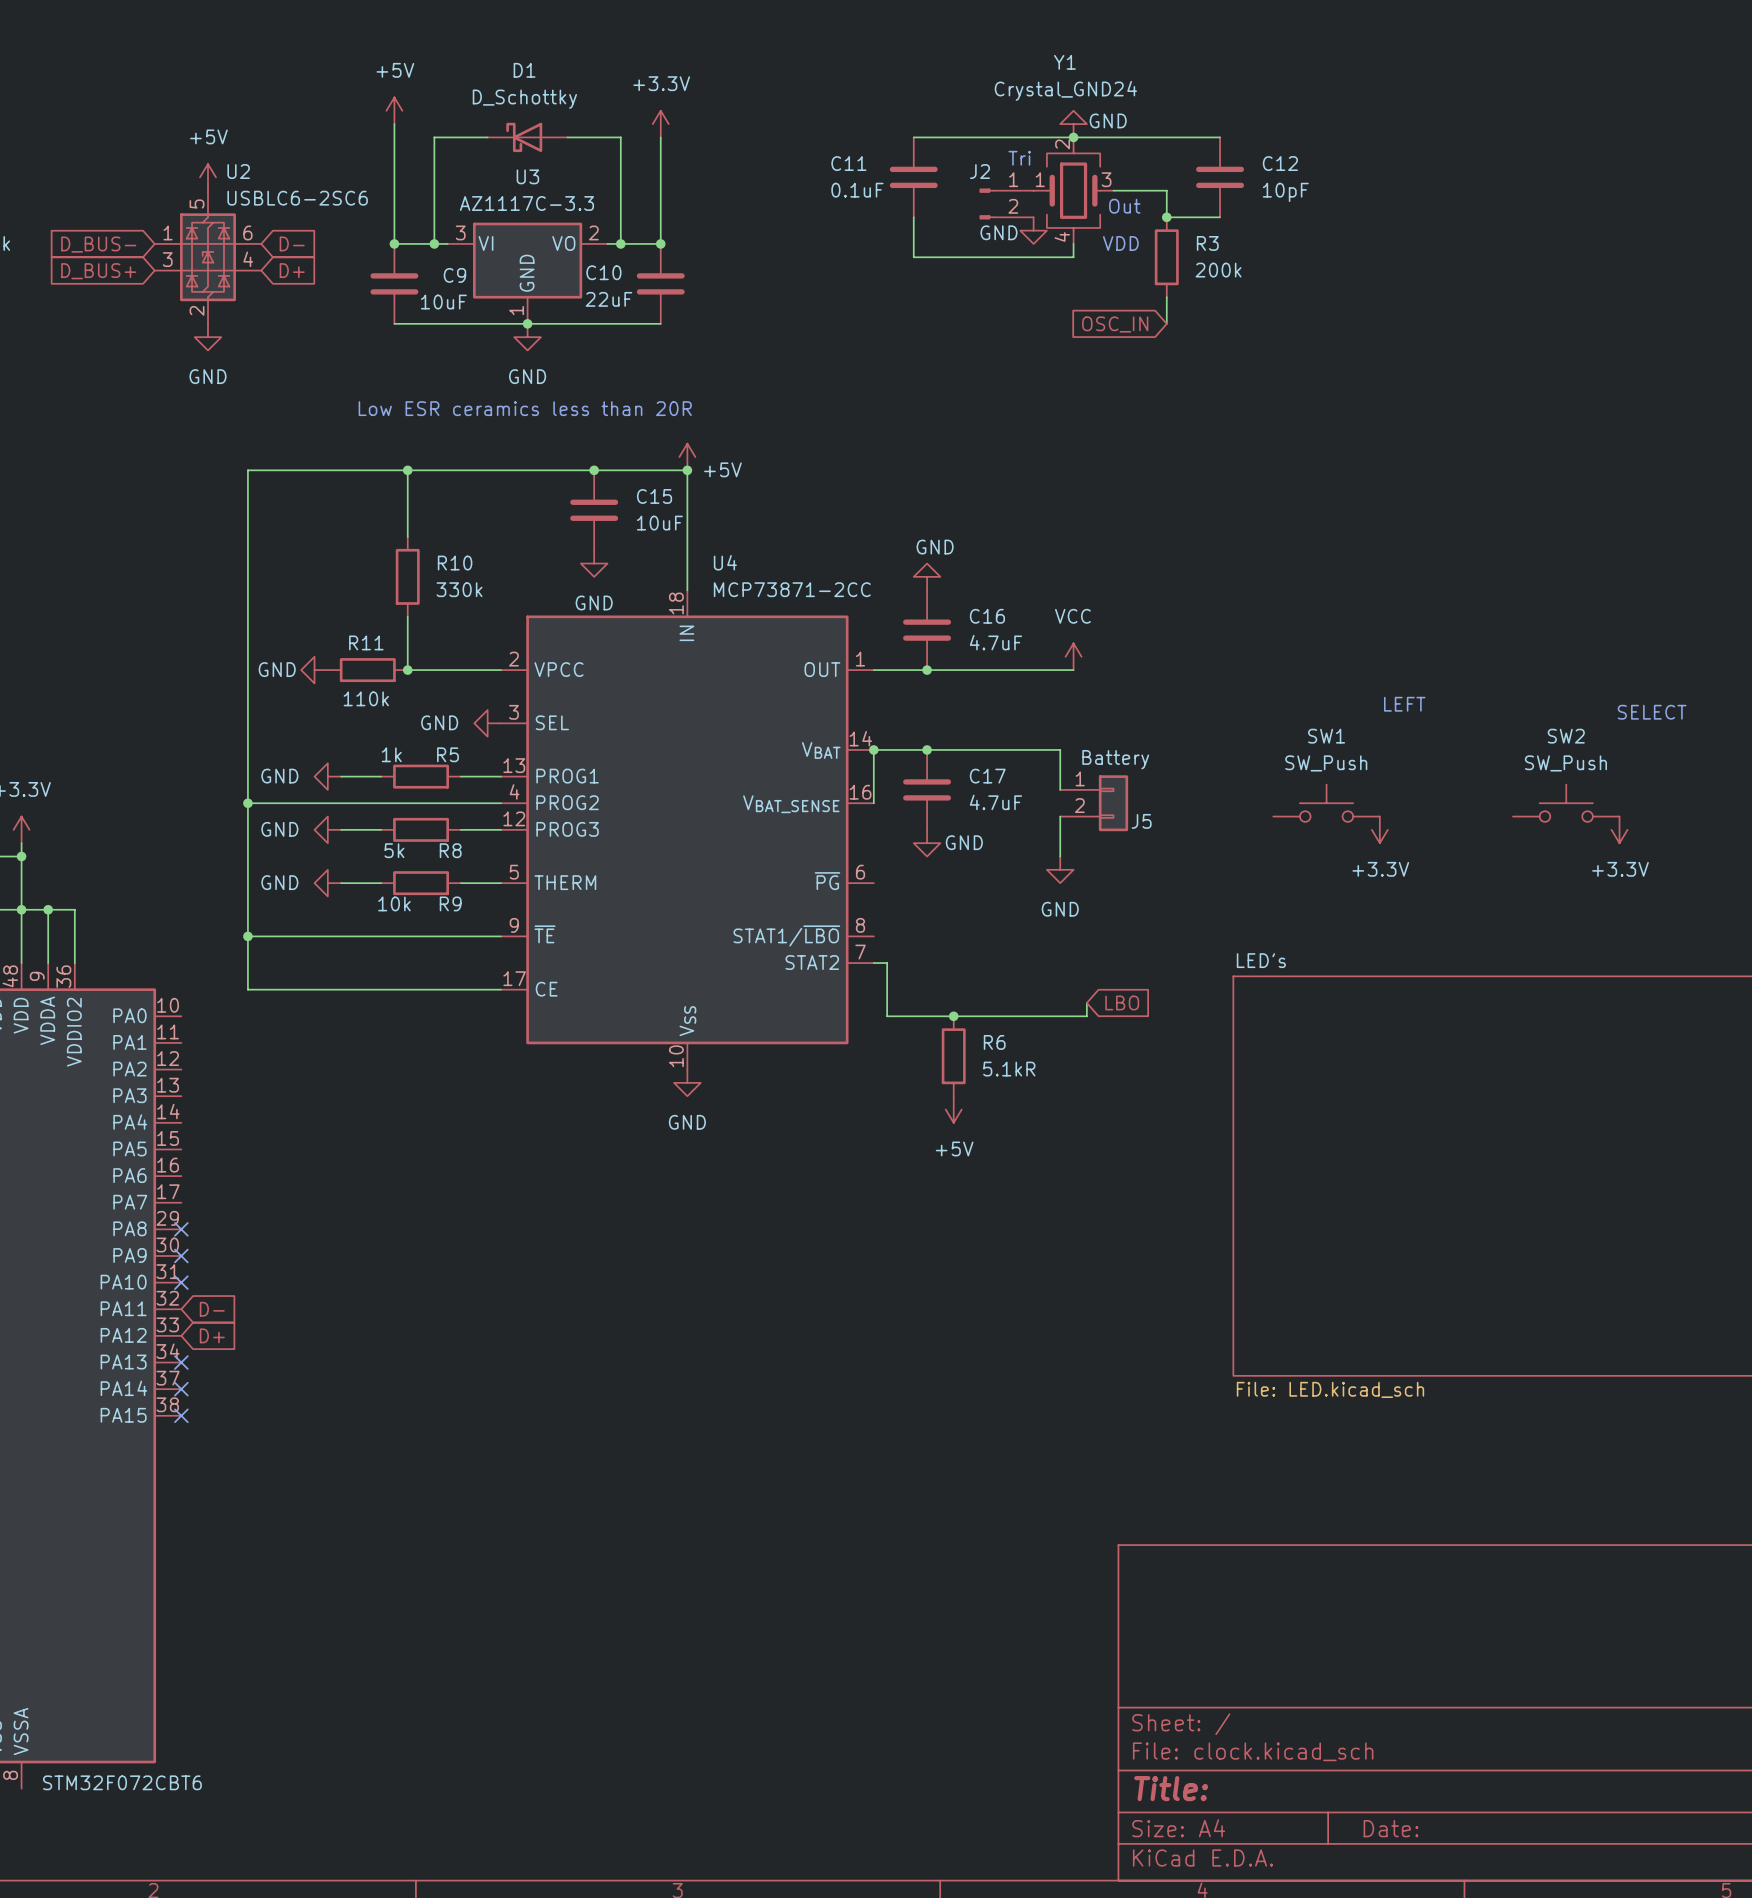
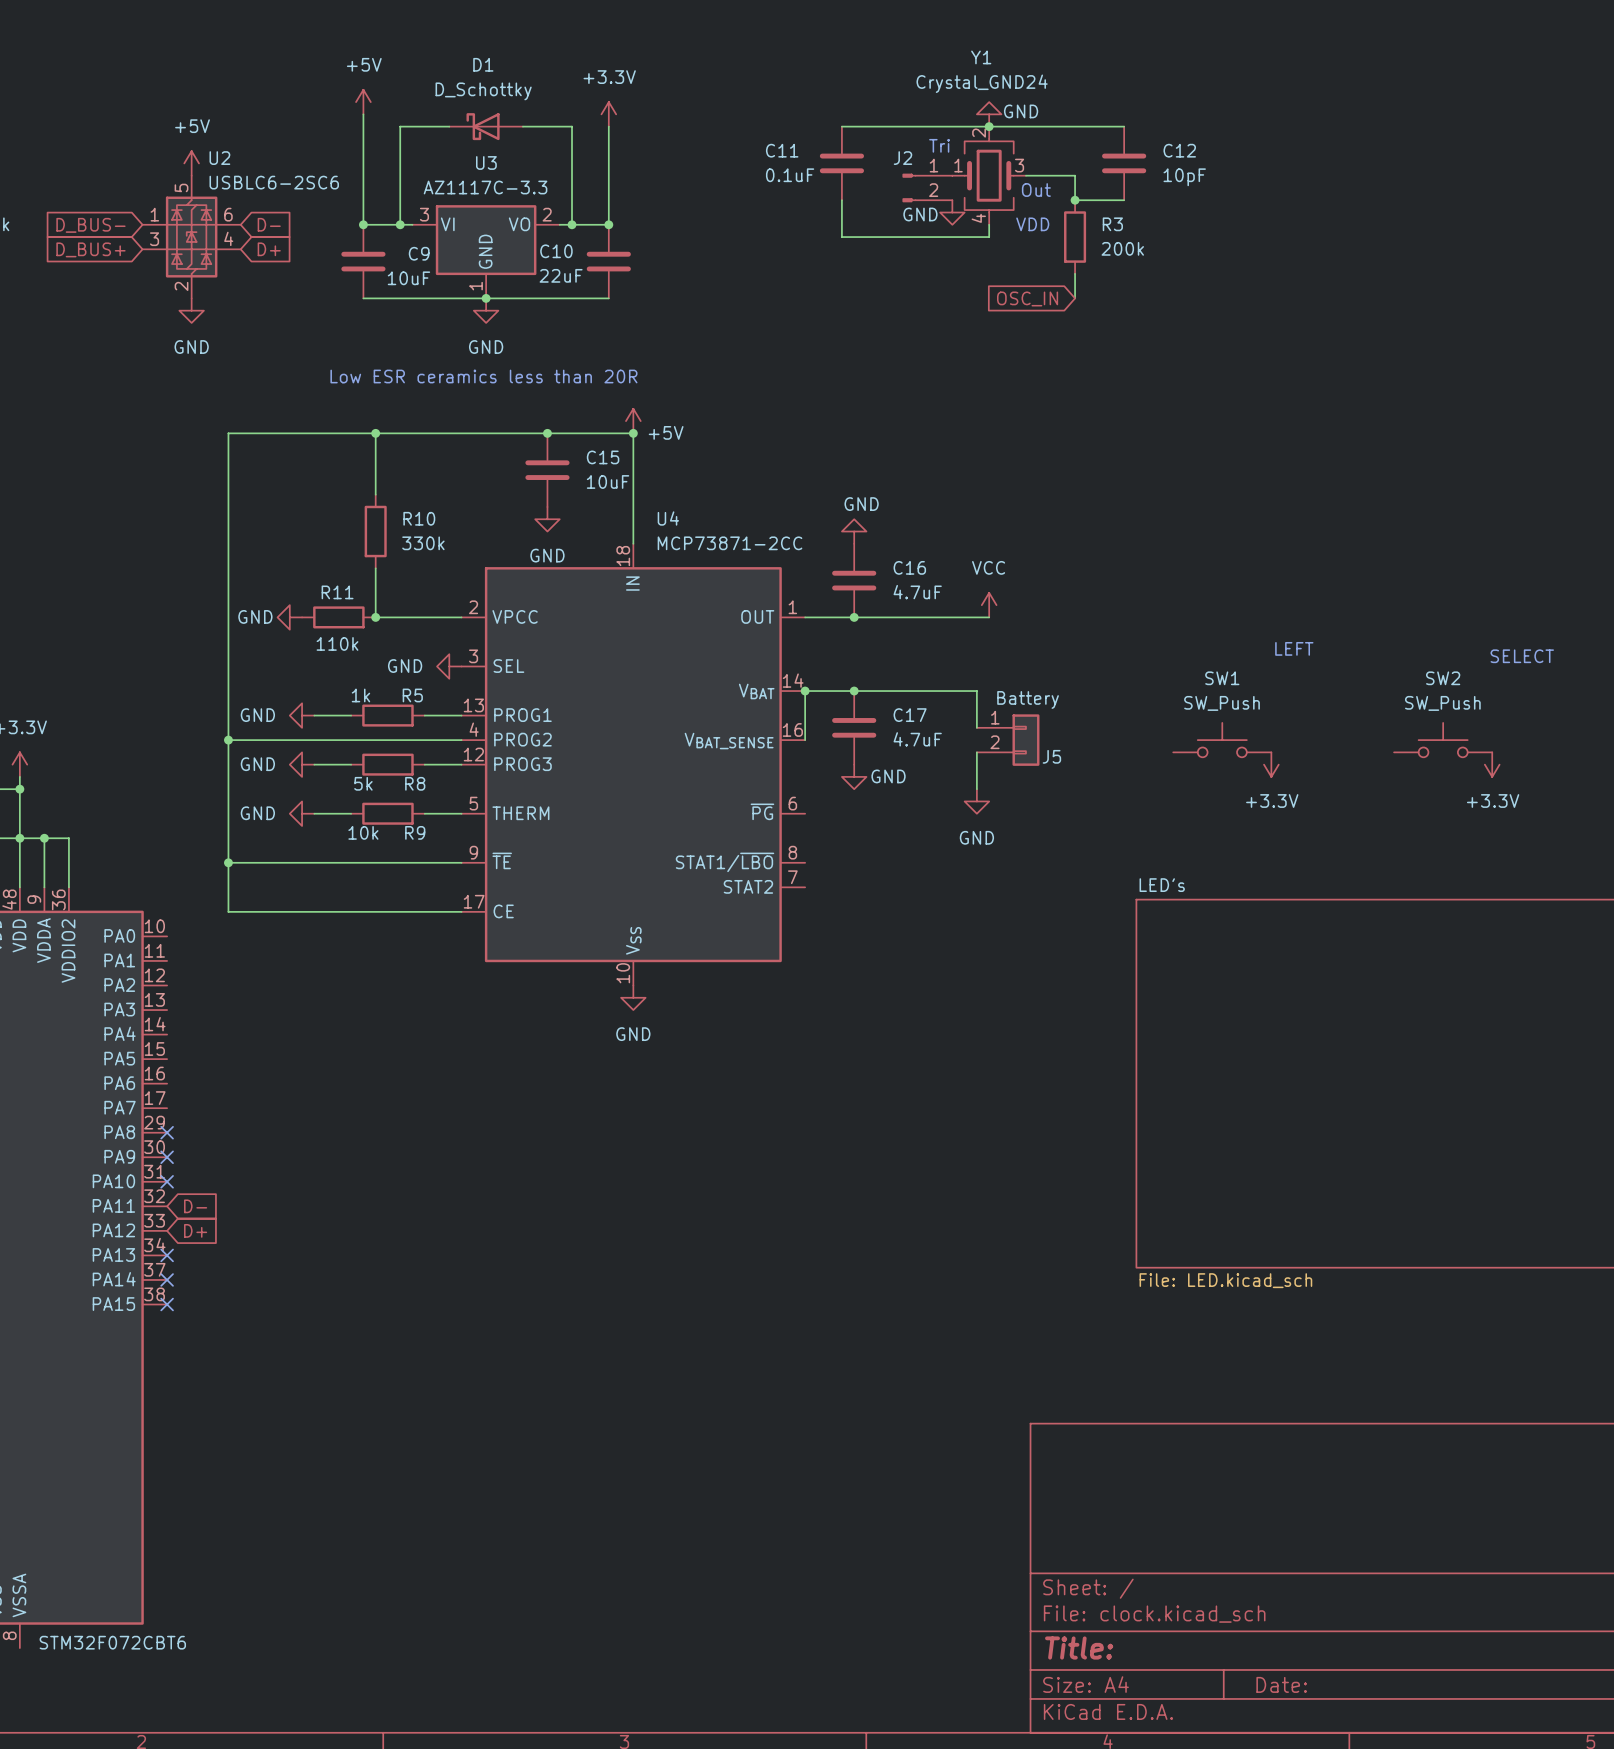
wire: (873, 963) (887, 963) (887, 1016) (1086, 1016) (1086, 1002) -> none
global label: LBO (1122, 1002) -> none
junction: (953, 1016) -> none
R6: 5.1kR (953, 1056) -> none
power symbol: +5V (953, 1109) -> none

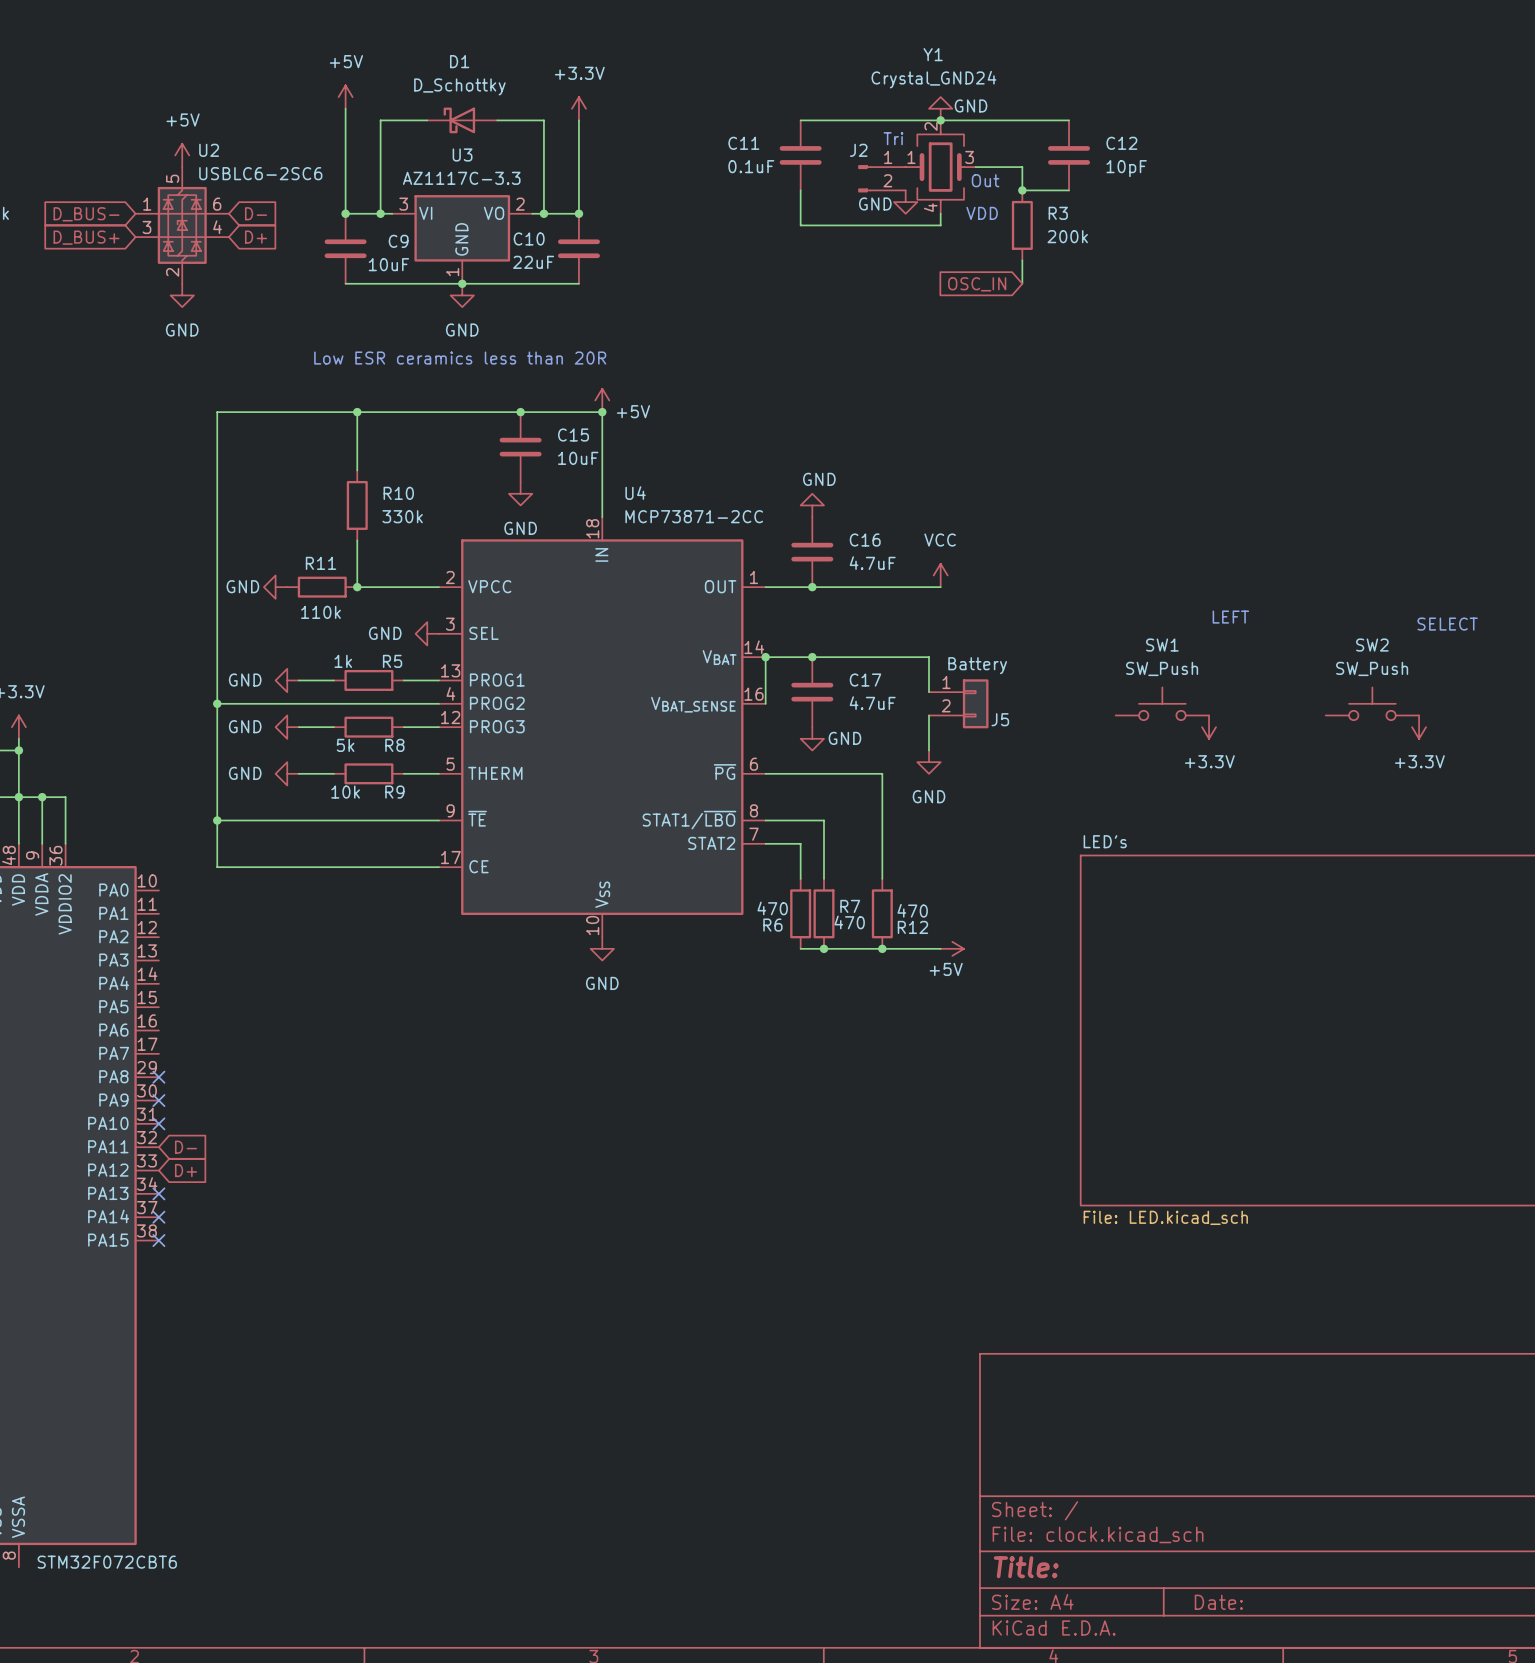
wire: none -> (765, 773) (882, 773) (882, 878)
wire: none -> (765, 820) (823, 820) (823, 878)
wire: none -> (765, 843) (800, 843) (800, 878)
R6: none -> 470 (800, 913)
R7: none -> 470 (823, 913)
R12: none -> 470 (882, 913)
wire: none -> (800, 948) (940, 948)
junction: none -> (823, 948)
junction: none -> (882, 948)
power symbol: none -> +5V (952, 948)

